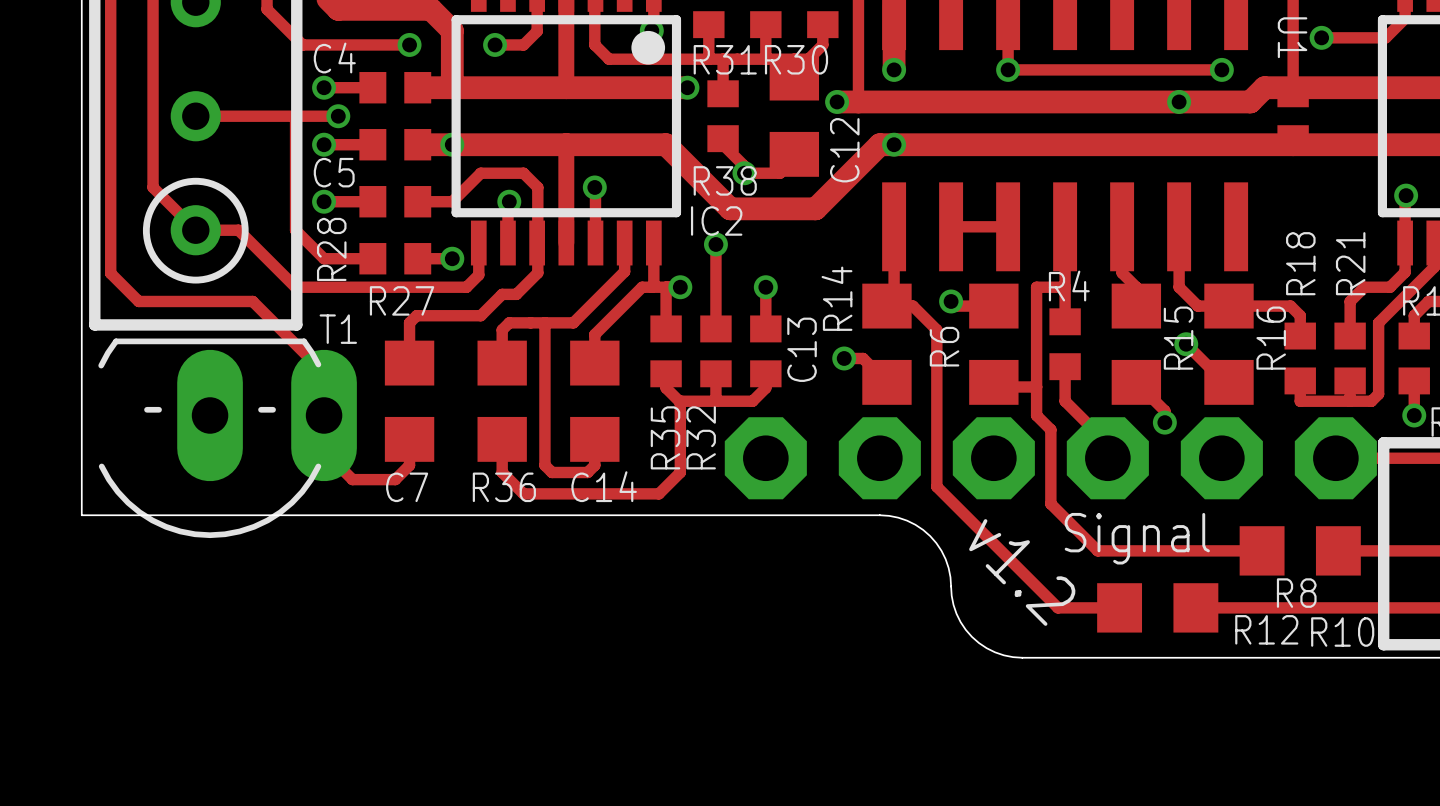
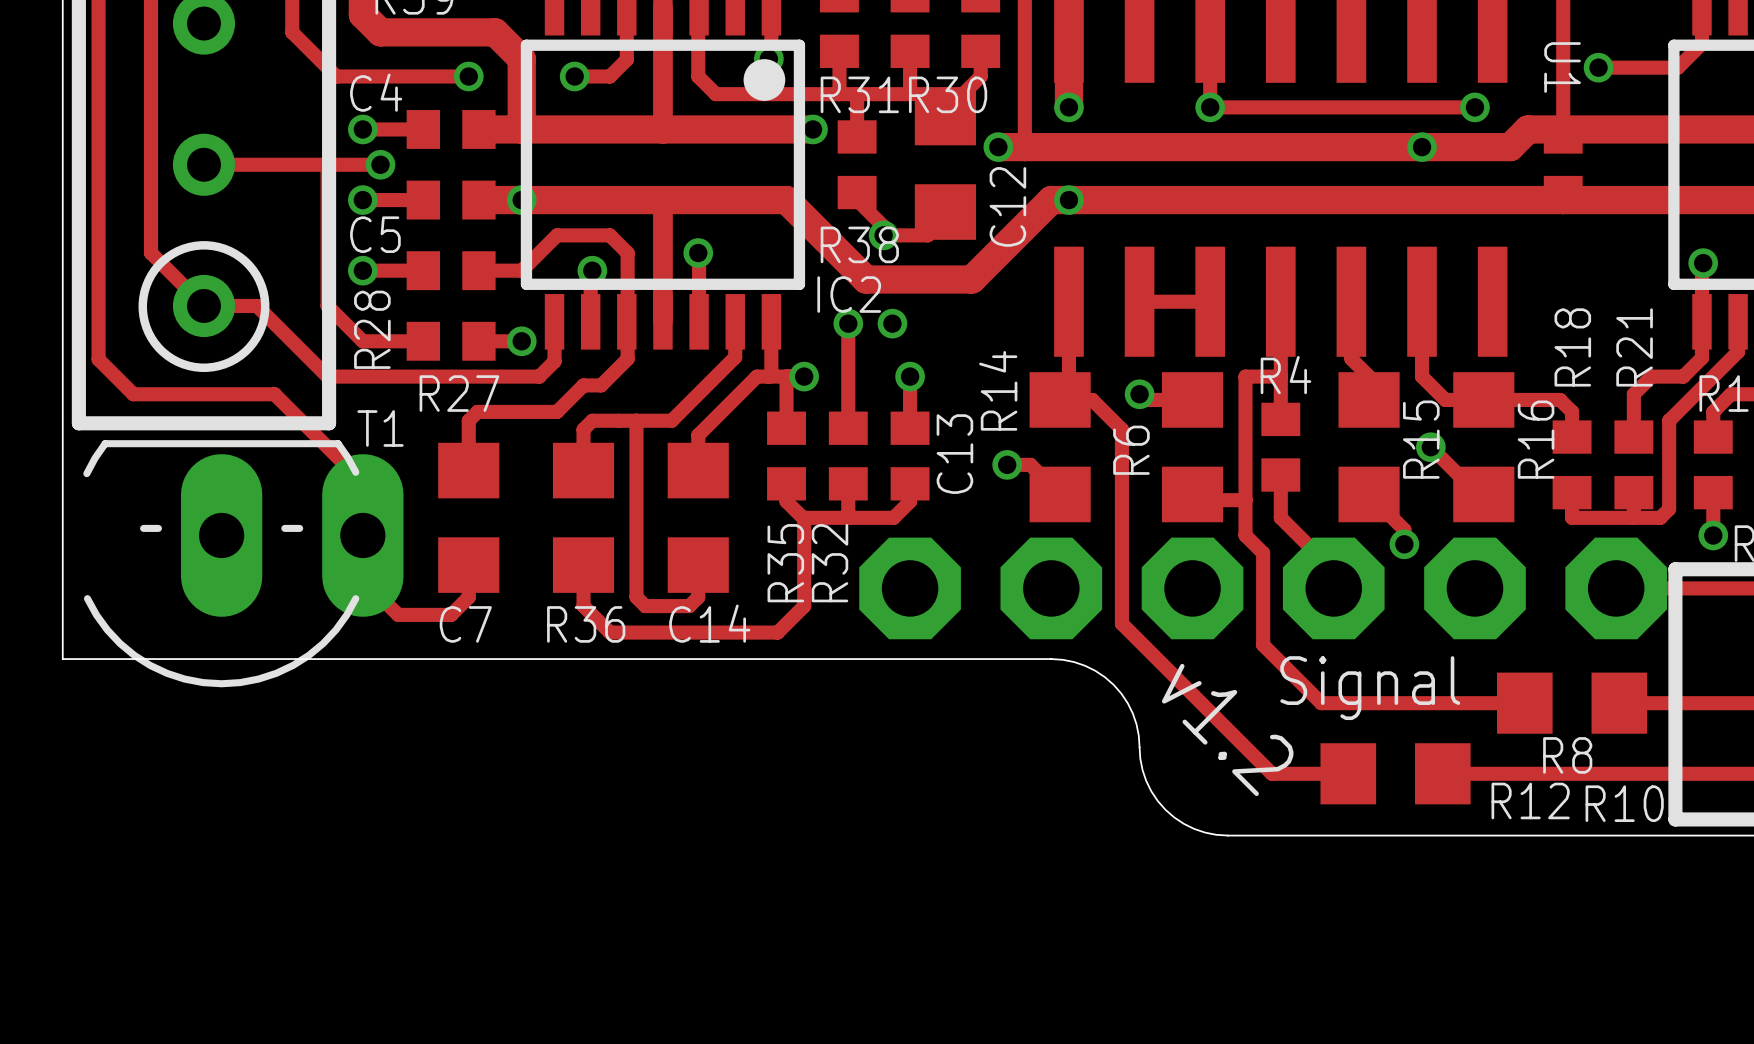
via: none -> (892, 323)

